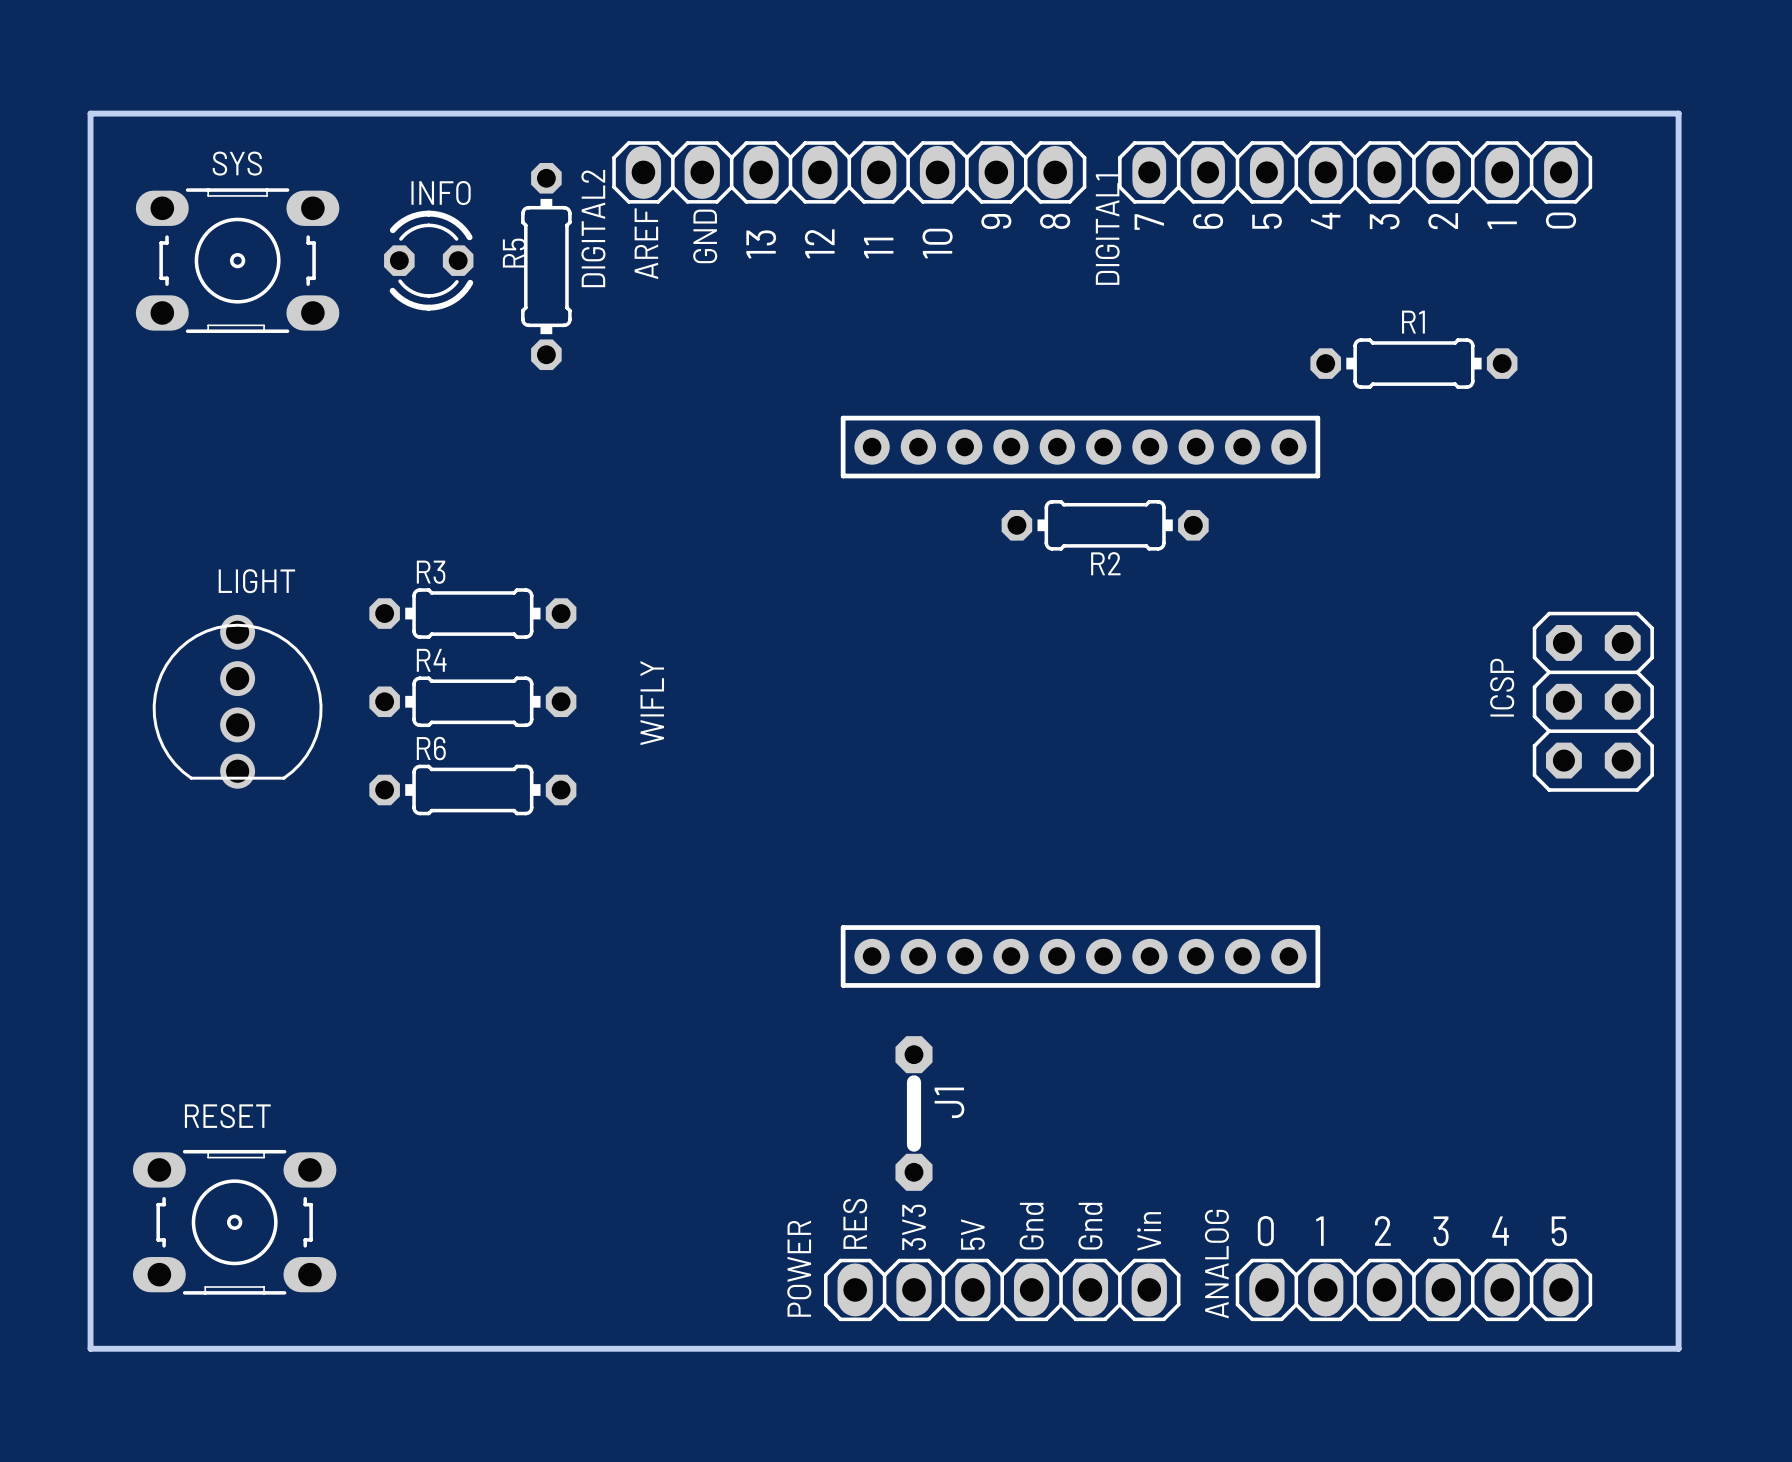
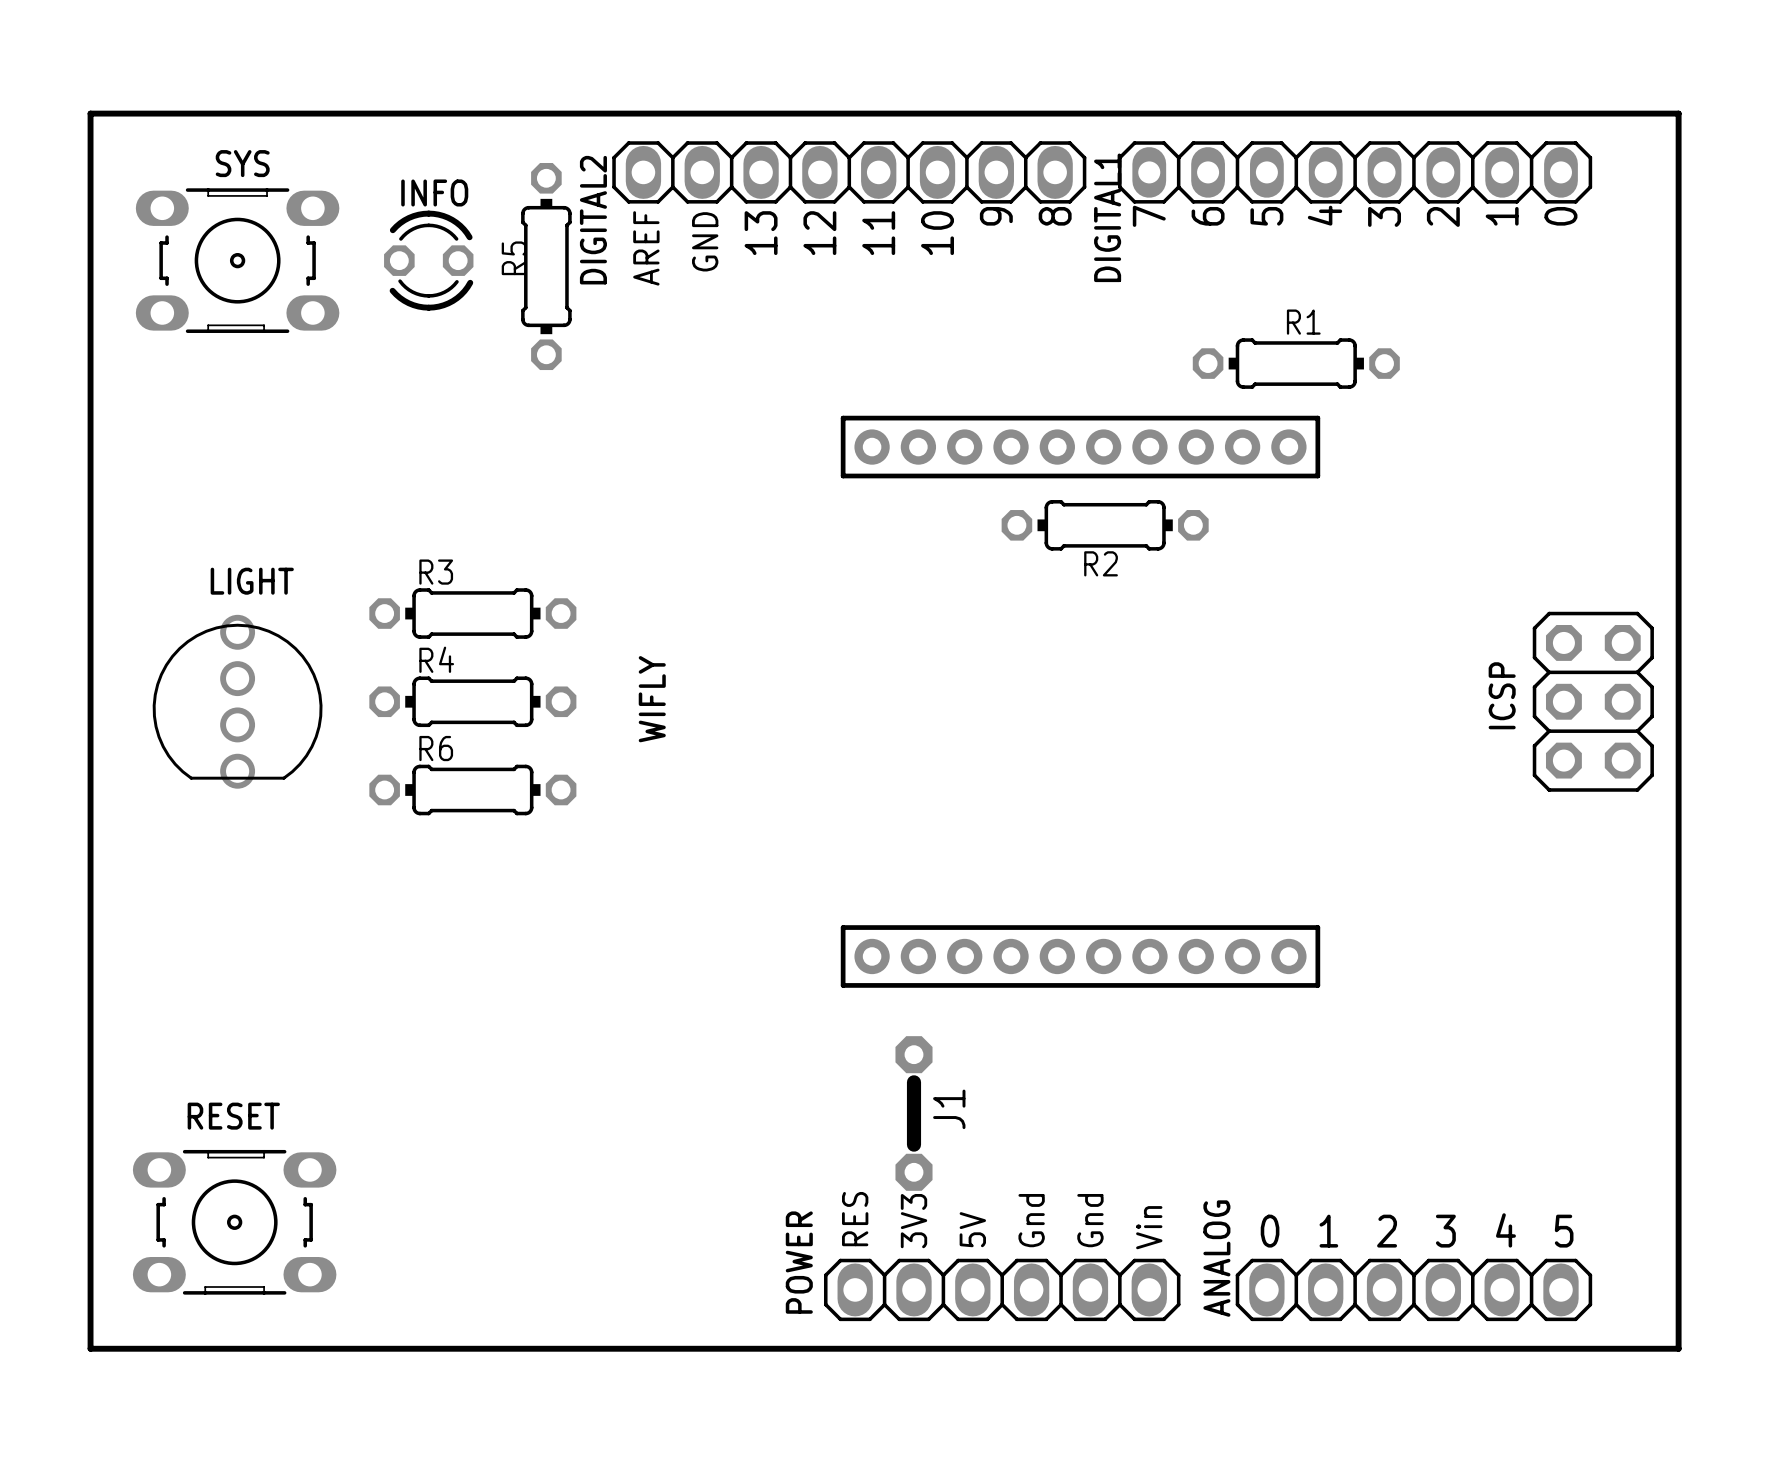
R1 position: (1413, 363) -> (1296, 363)

